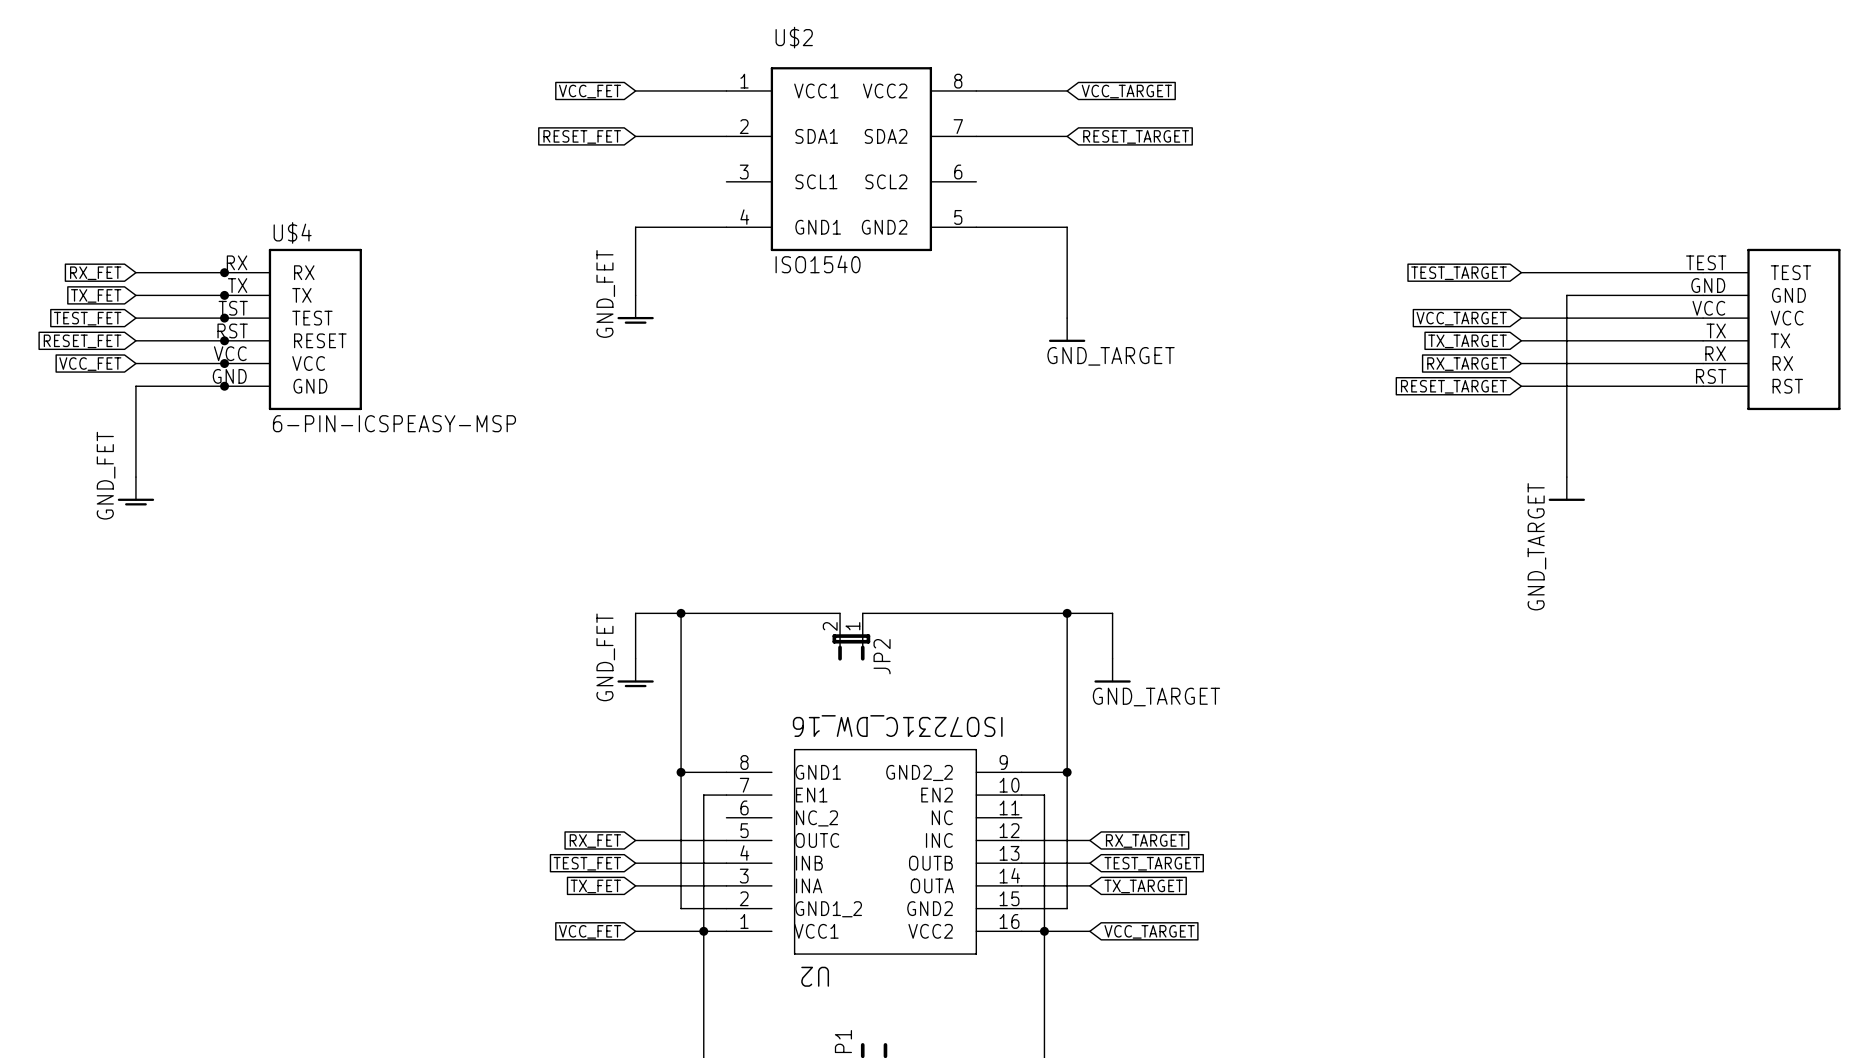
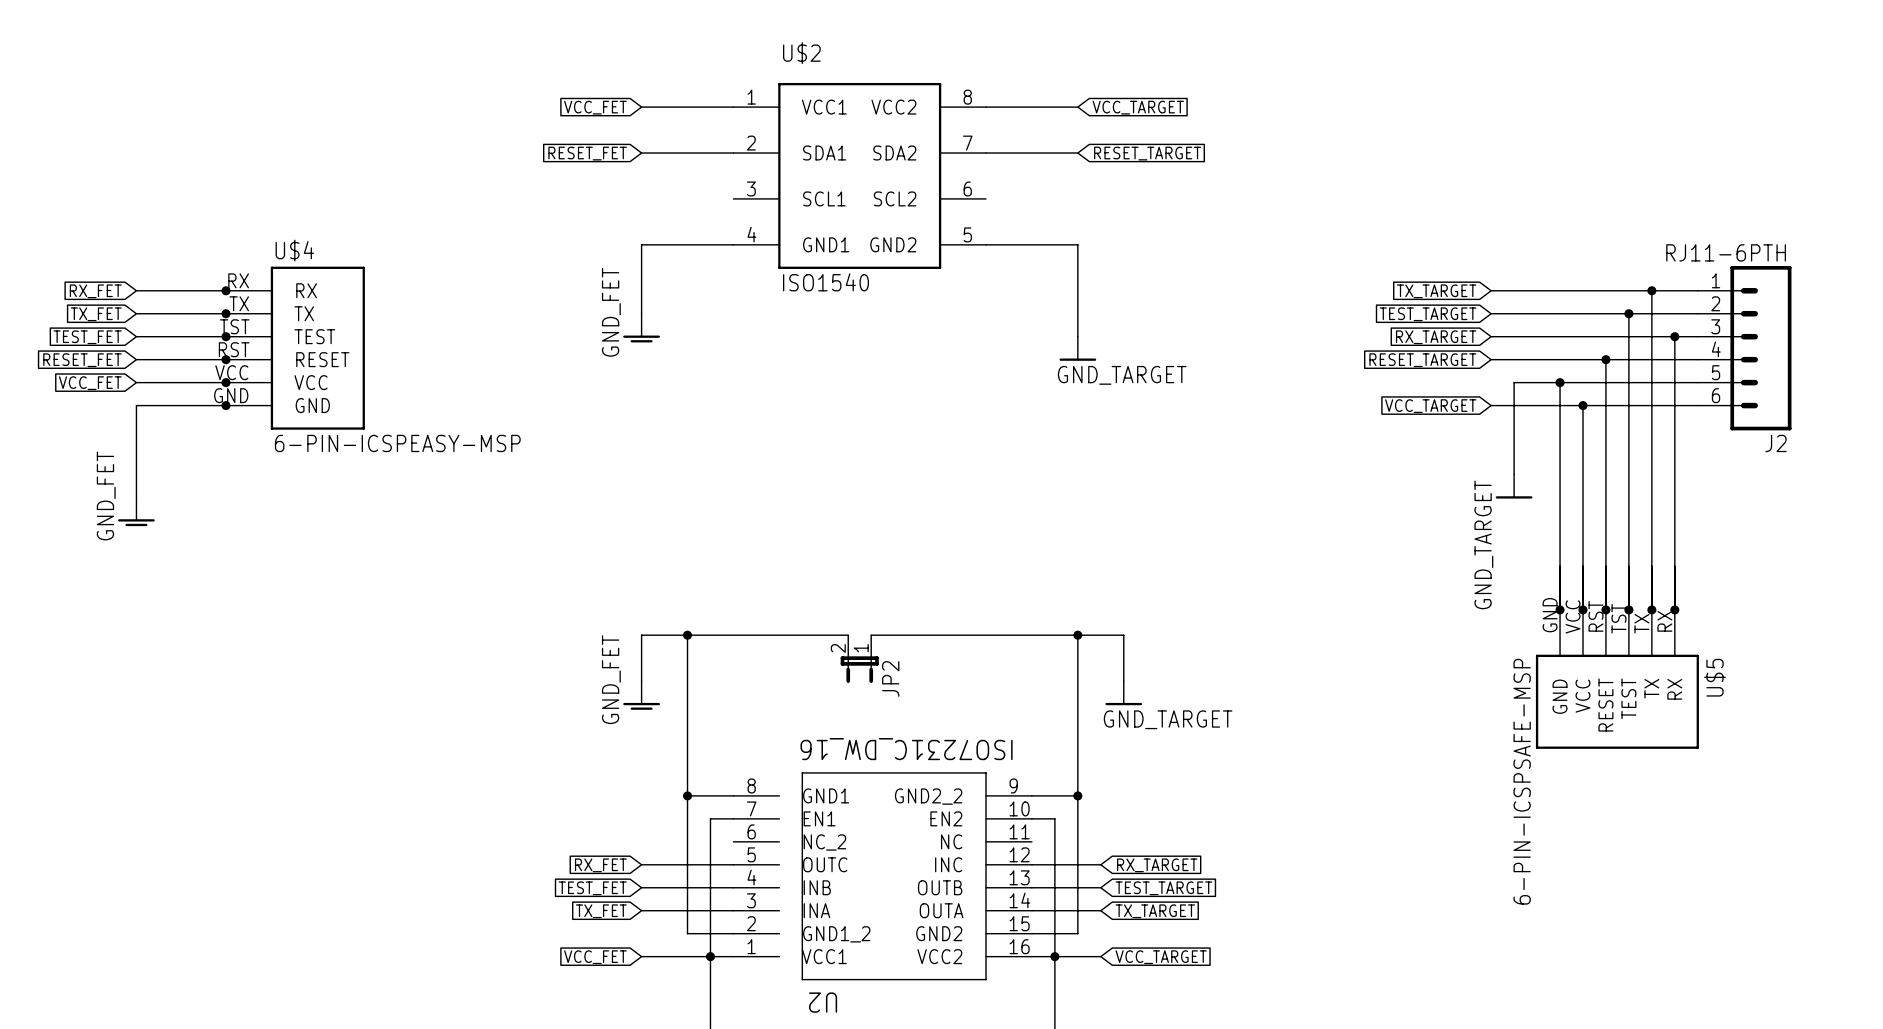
wire: none -> (1491, 290) (1537, 290)
wire: none -> (1651, 290) (1651, 609)
junction: none -> (1651, 290)
global label position: TEST_TARGET (1458, 273) -> TEST_TARGET (1428, 314)
wire: (1566, 295) (1566, 386) -> (1582, 313) (1491, 313)
wire: none -> (1628, 313) (1628, 609)
junction: none -> (1628, 313)
global label position: VCC_TARGET (1461, 318) -> VCC_TARGET (1430, 406)
wire: none -> (1491, 336) (1537, 336)
wire: none -> (1674, 336) (1674, 609)
junction: none -> (1674, 336)
J2: none -> RJ11-6PTH (1744, 348)
part: (1771, 329) -> none
wire: none -> (1491, 359) (1537, 359)
wire: none -> (1605, 359) (1605, 609)
junction: none -> (1605, 359)
global label position: TX_TARGET (1467, 341) -> TX_TARGET (1436, 291)
wire: none -> (1537, 382) (1514, 382) (1514, 474)
wire: none -> (1560, 382) (1560, 609)
junction: none -> (1560, 382)
global label position: RX_TARGET (1467, 364) -> RX_TARGET (1436, 337)
global label position: RESET_TARGET (1453, 386) -> RESET_TARGET (1422, 360)
wire: none -> (1491, 405) (1537, 405)
junction: none -> (1582, 405)
wire: none -> (1582, 497) (1582, 609)
power symbol position: GND_TARGET (1566, 489) -> GND_TARGET (1514, 486)
junction: none -> (1560, 609)
junction: none -> (1582, 609)
junction: none -> (1605, 609)
junction: none -> (1628, 609)
junction: none -> (1651, 609)
junction: none -> (1674, 609)
U$5: none -> 6-PIN-ICSPSAFE-MSP (1617, 679)

